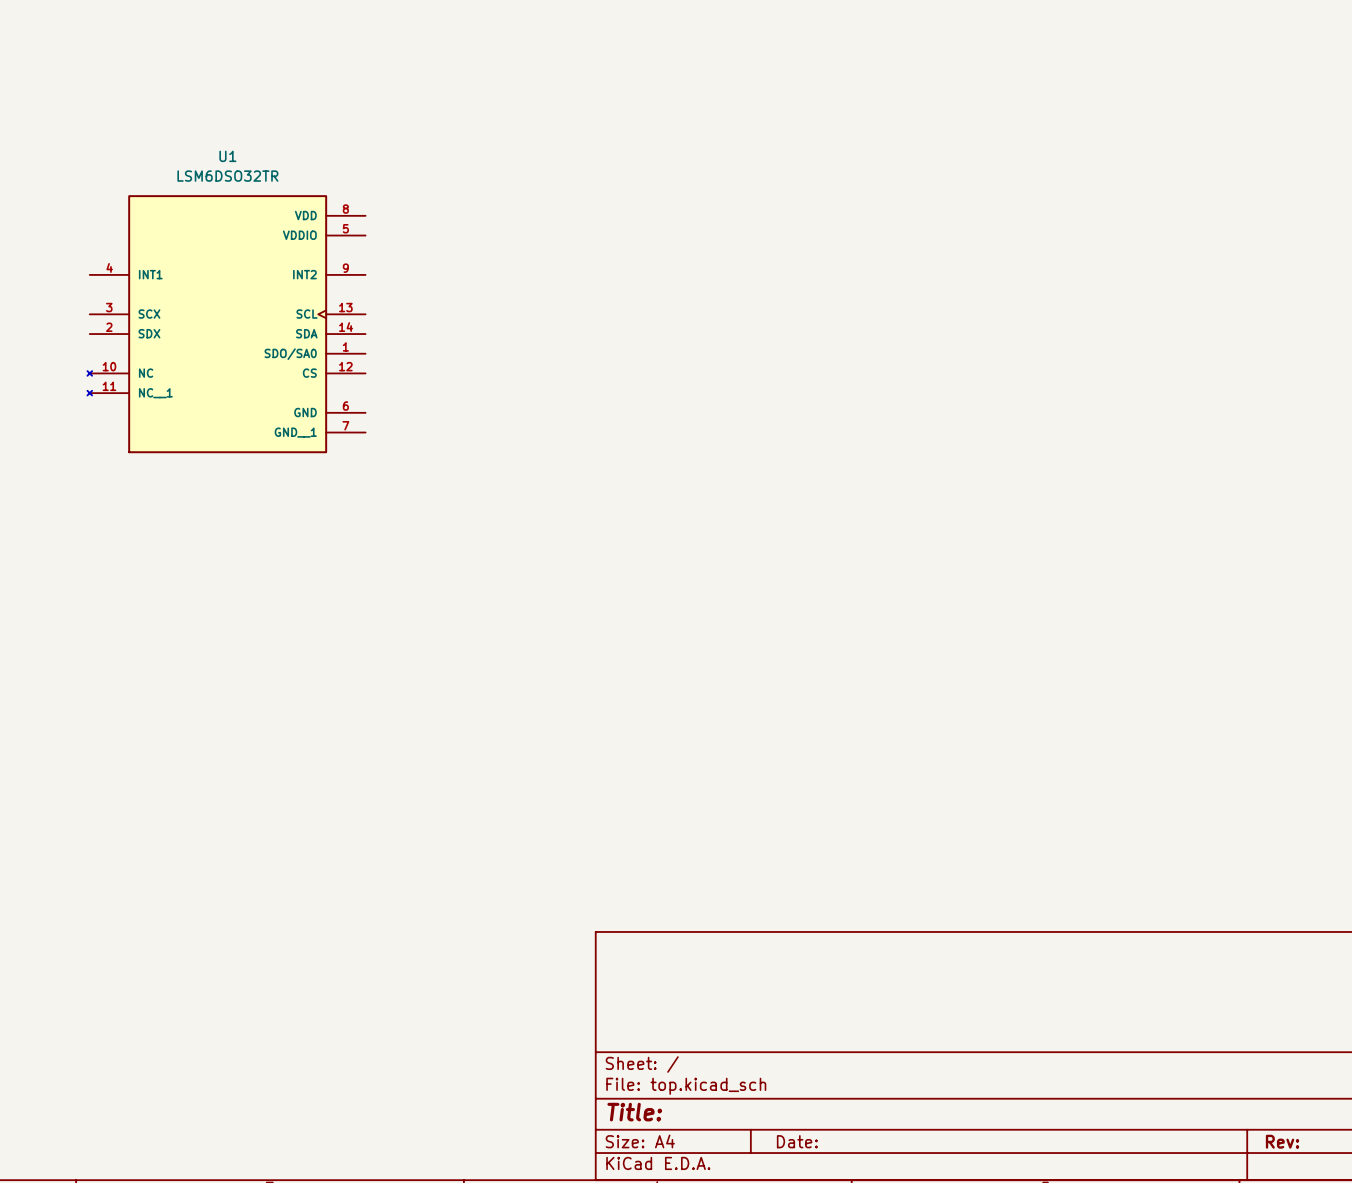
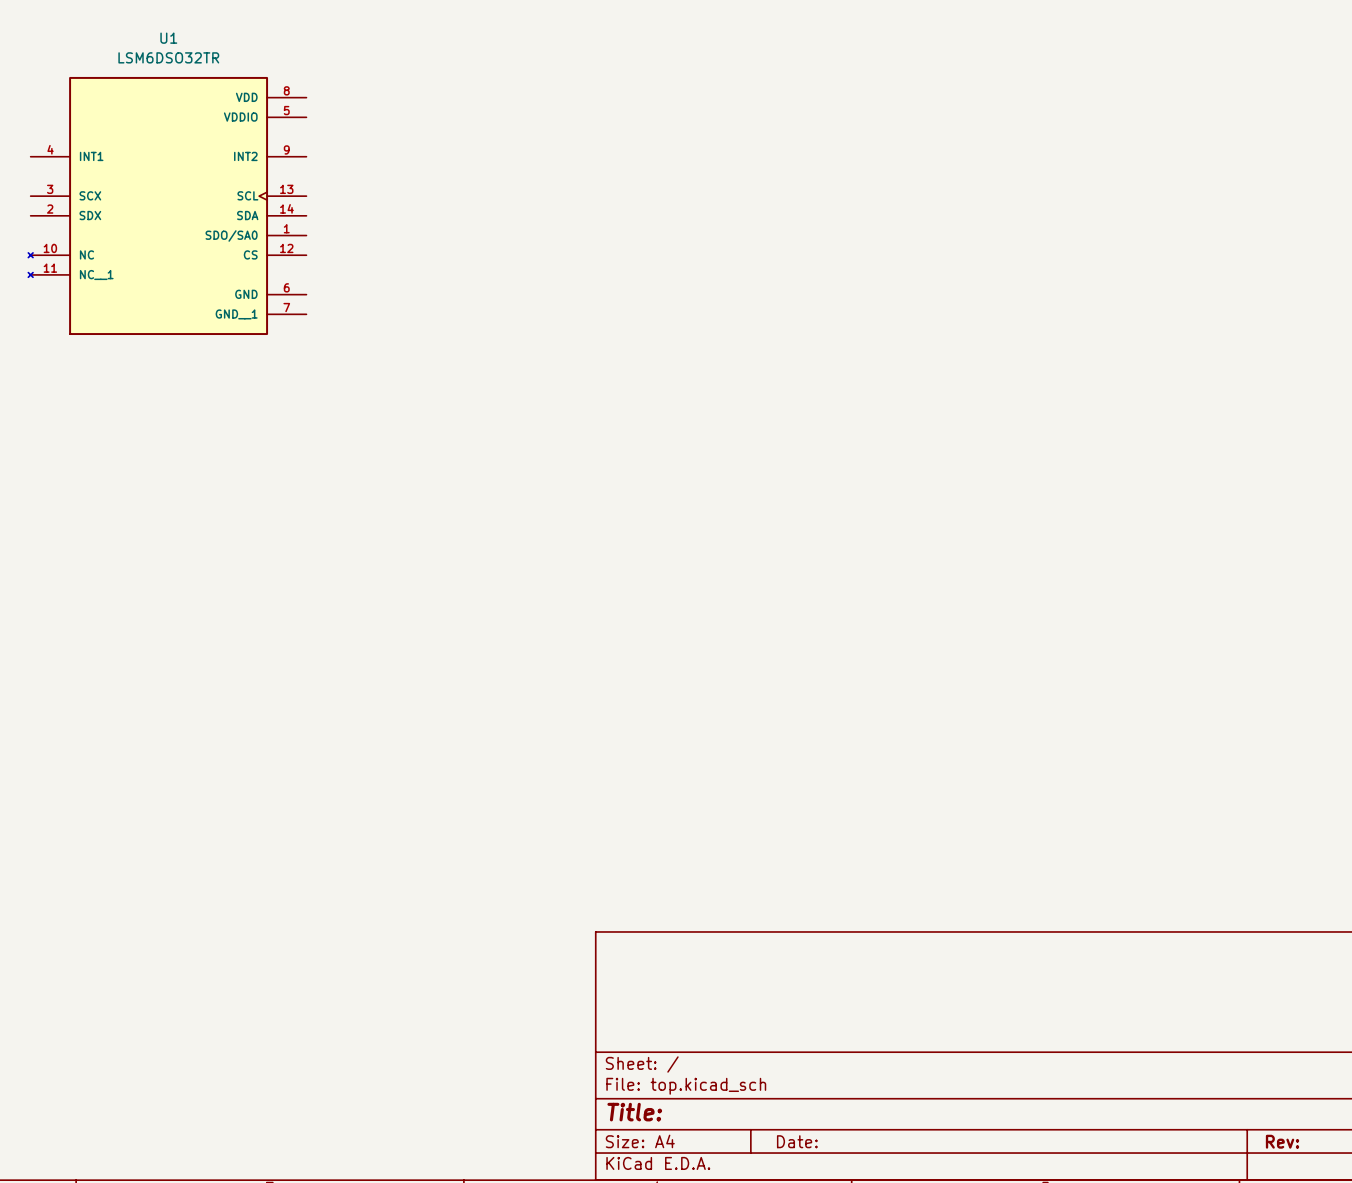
U1 position: (226, 324) -> (167, 205)

